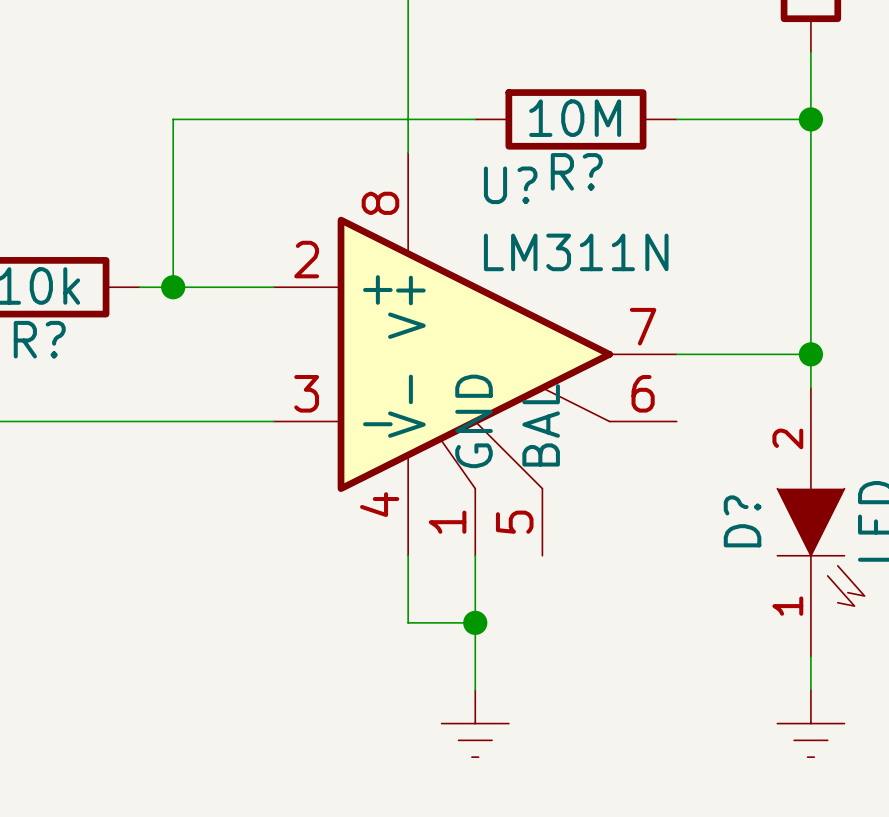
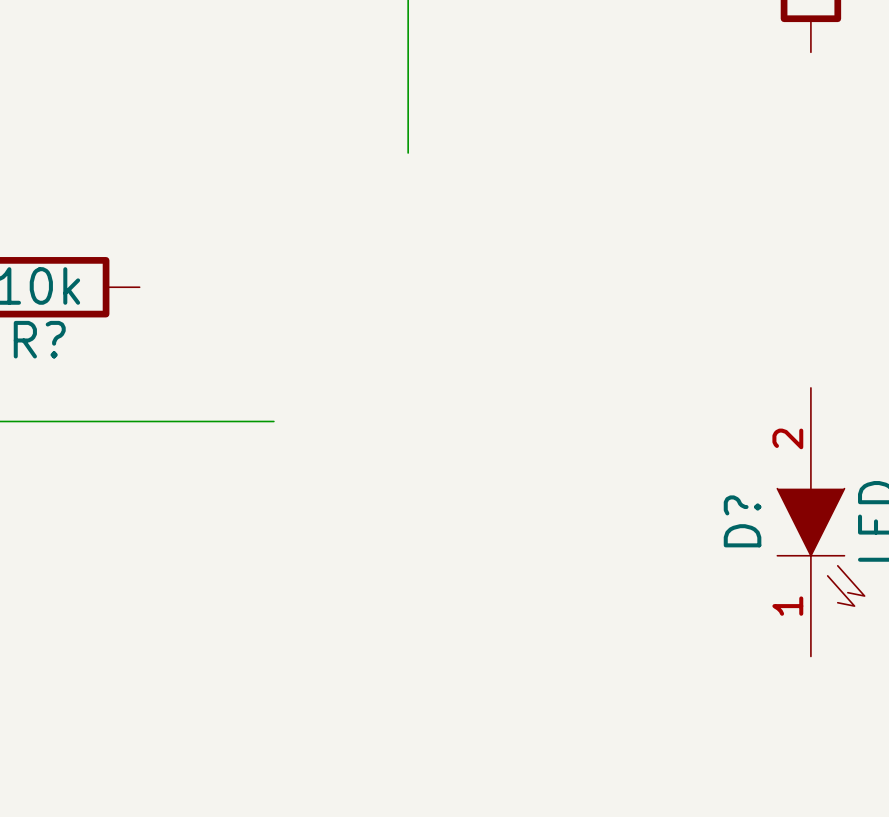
wire: (810, 52) (810, 387) -> none
wire: (475, 119) (173, 119) (173, 287) -> none
R?: 10M (575, 119) -> none
wire: (676, 119) (810, 119) -> none
junction: (810, 119) -> none
wire: (139, 287) (273, 287) -> none
junction: (173, 287) -> none
U?: LM311N (475, 354) -> none
wire: (676, 354) (810, 354) -> none
junction: (810, 354) -> none
wire: (408, 555) (408, 622) (475, 622) -> none
wire: (475, 555) (475, 690) -> none
junction: (475, 622) -> none
wire: (810, 656) (810, 690) -> none
power symbol: (475, 723) -> none
power symbol: (810, 723) -> none

